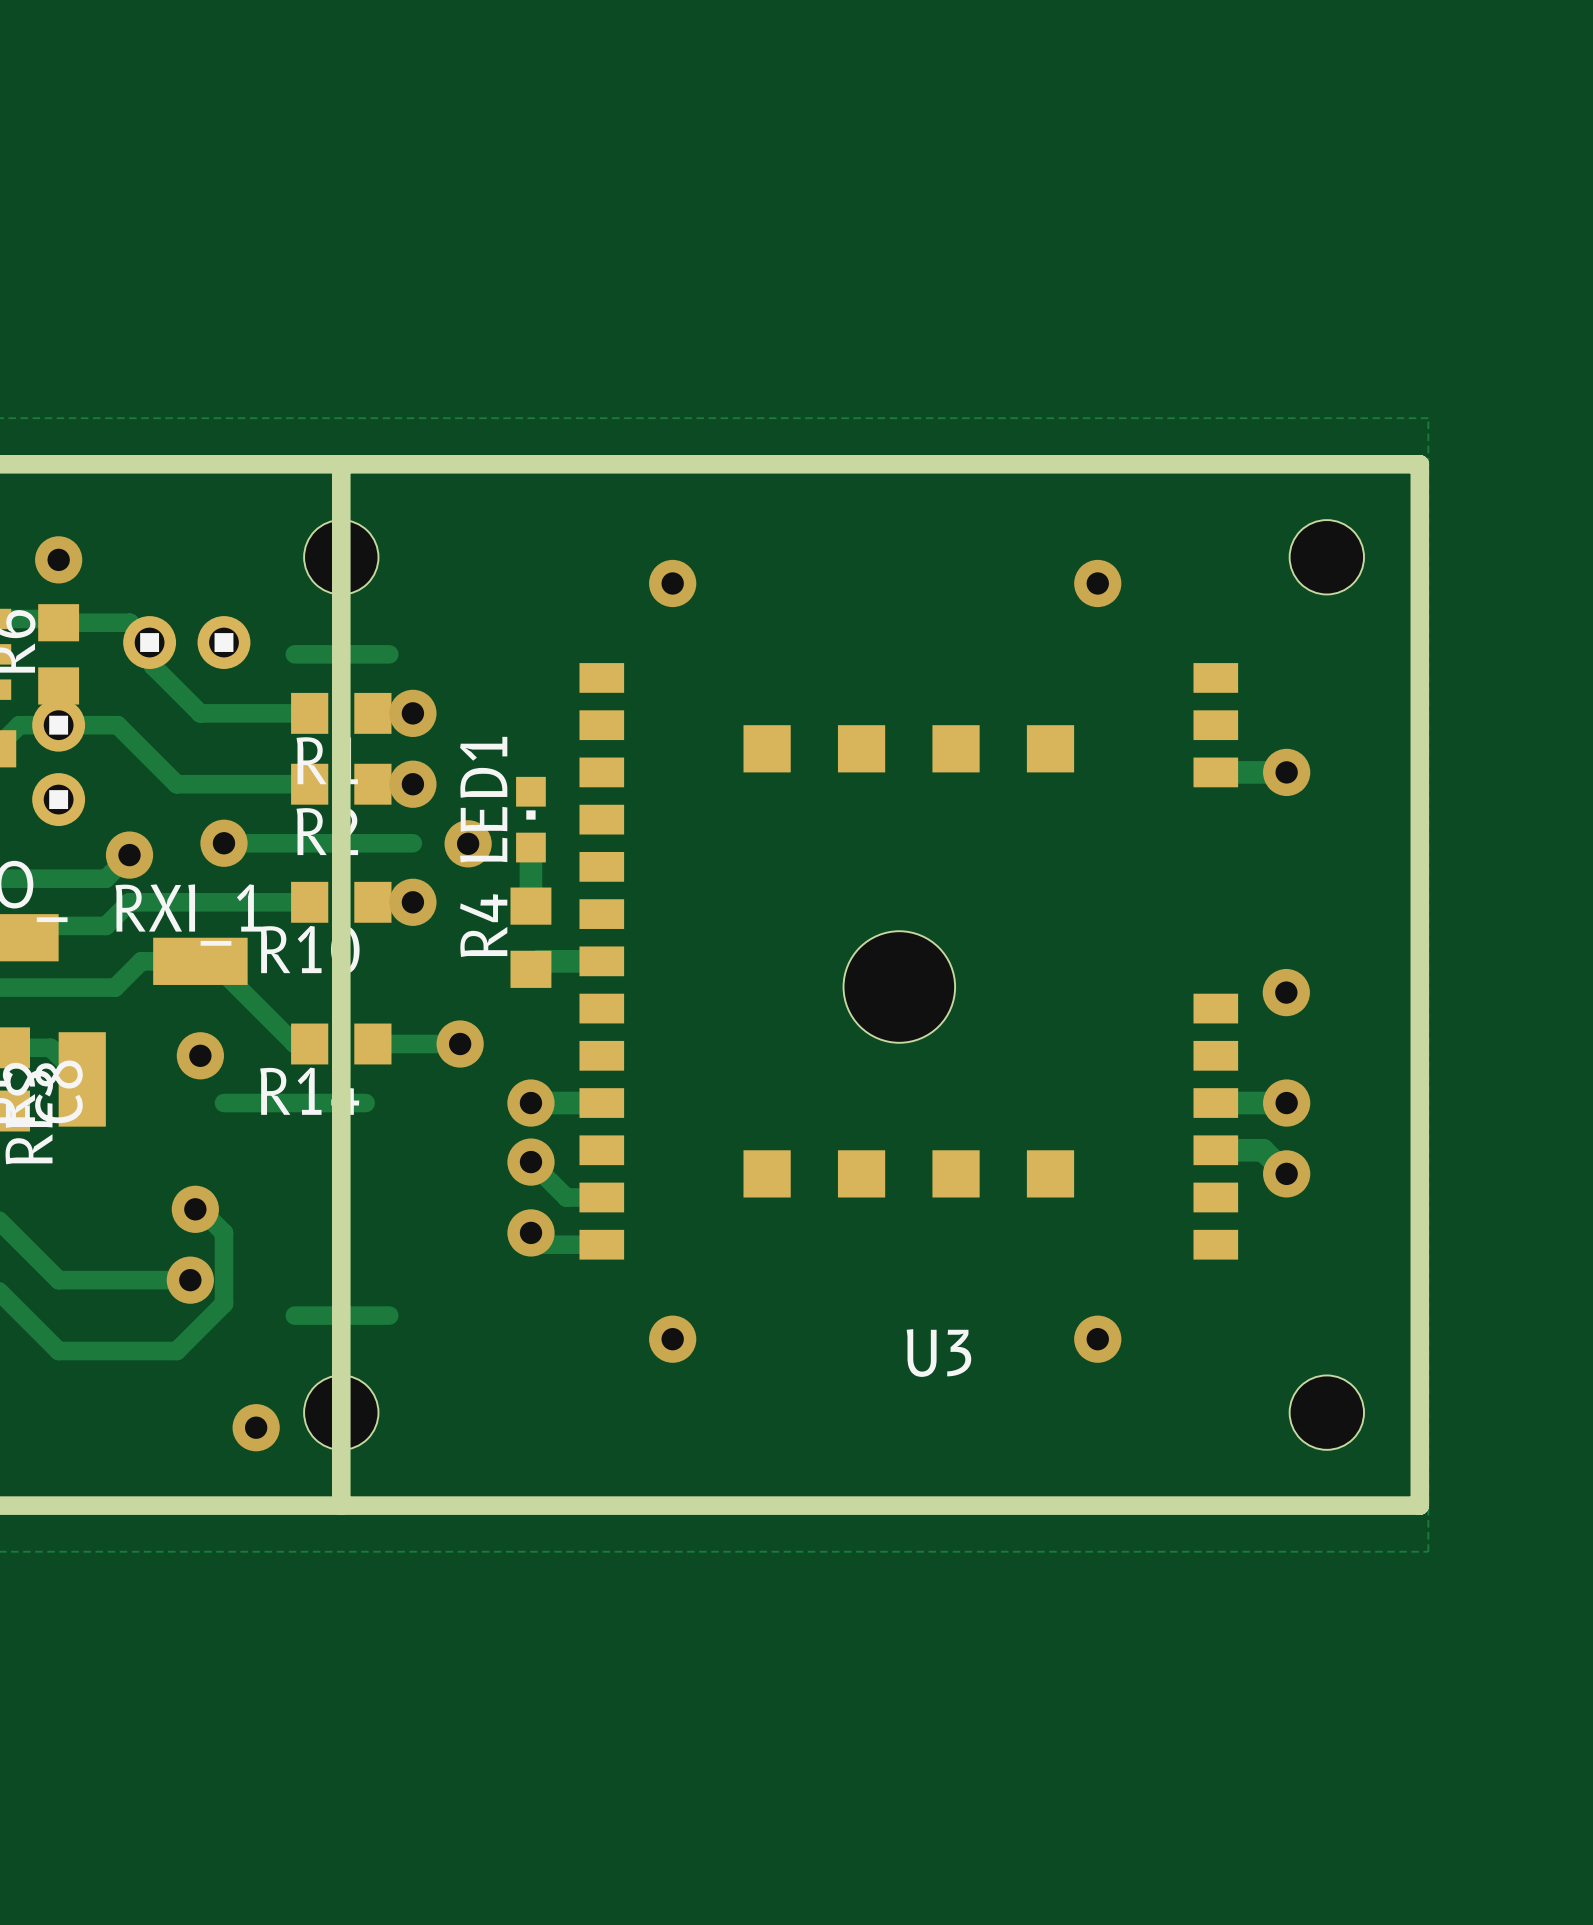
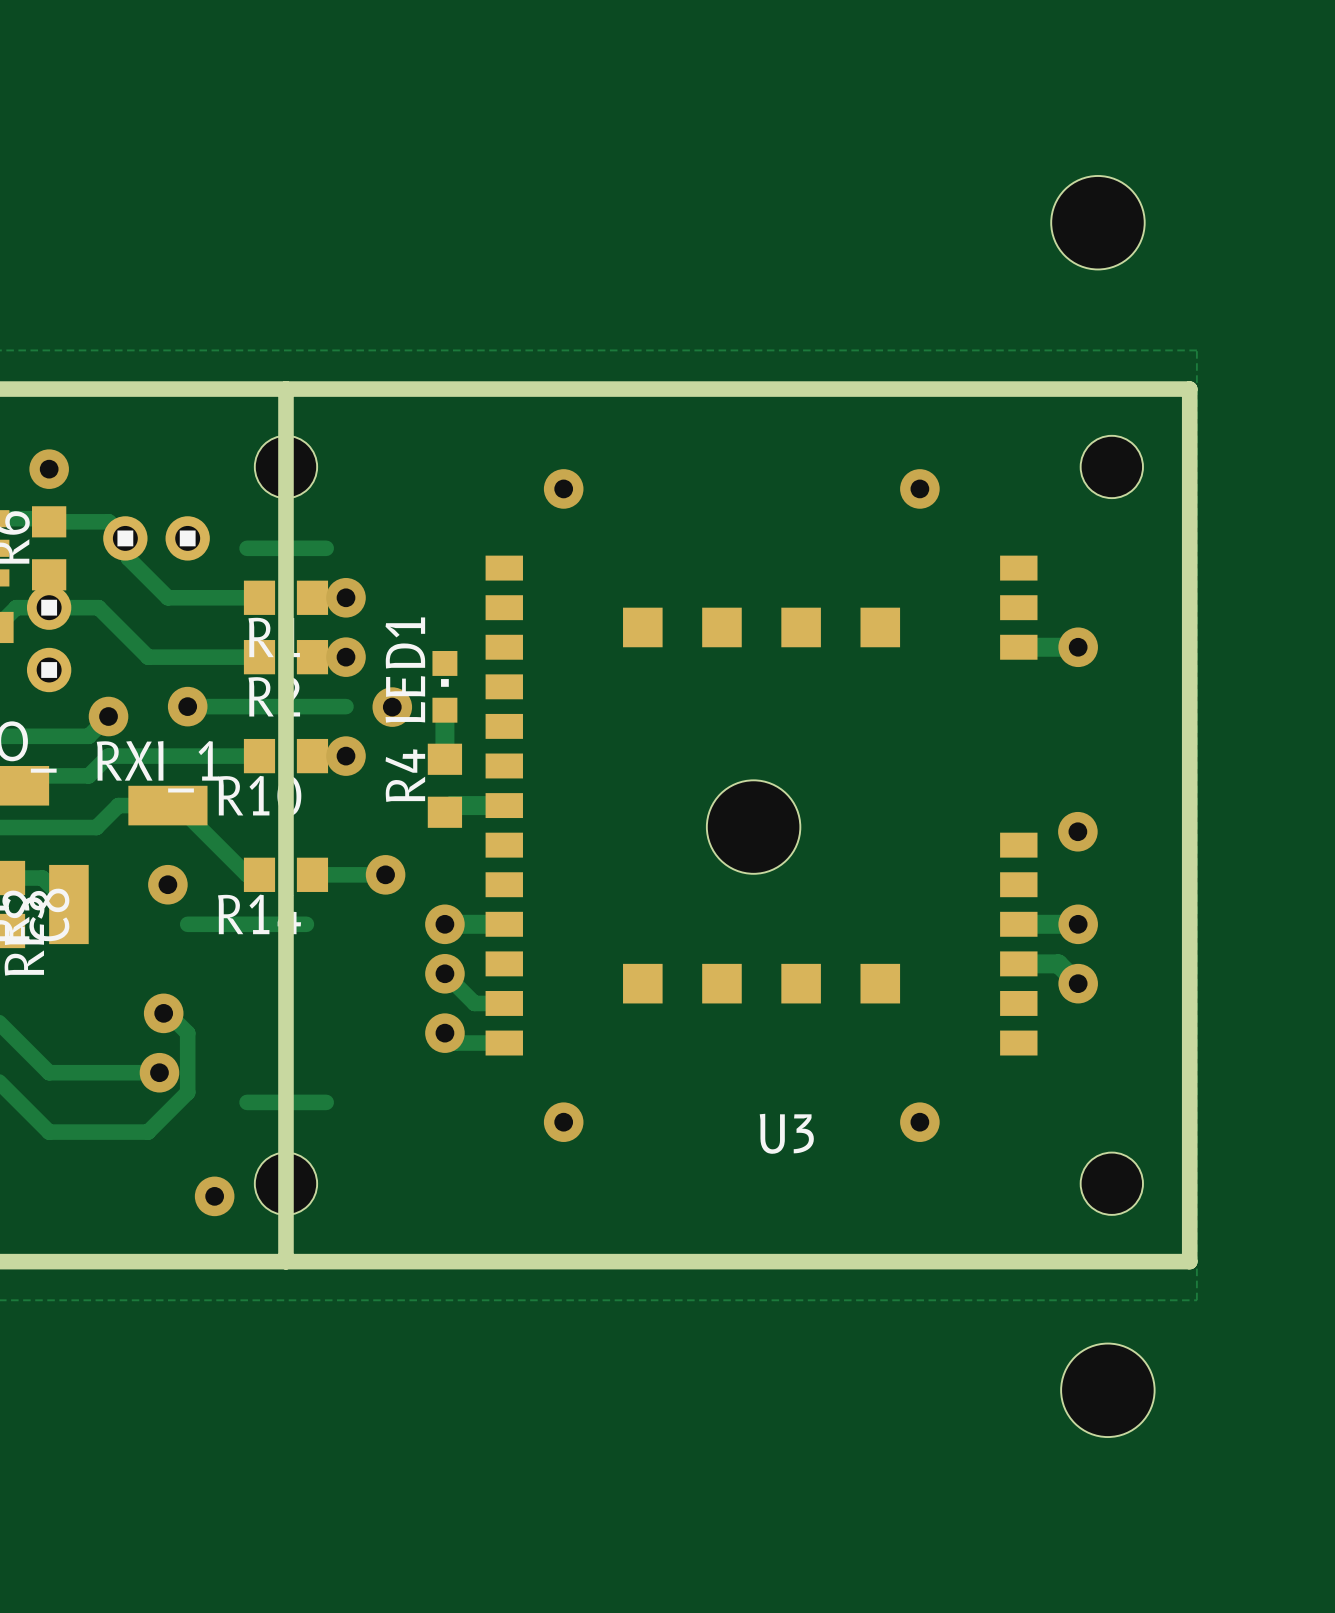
hole: none -> (1097, 222)
hole: none -> (1107, 1390)

